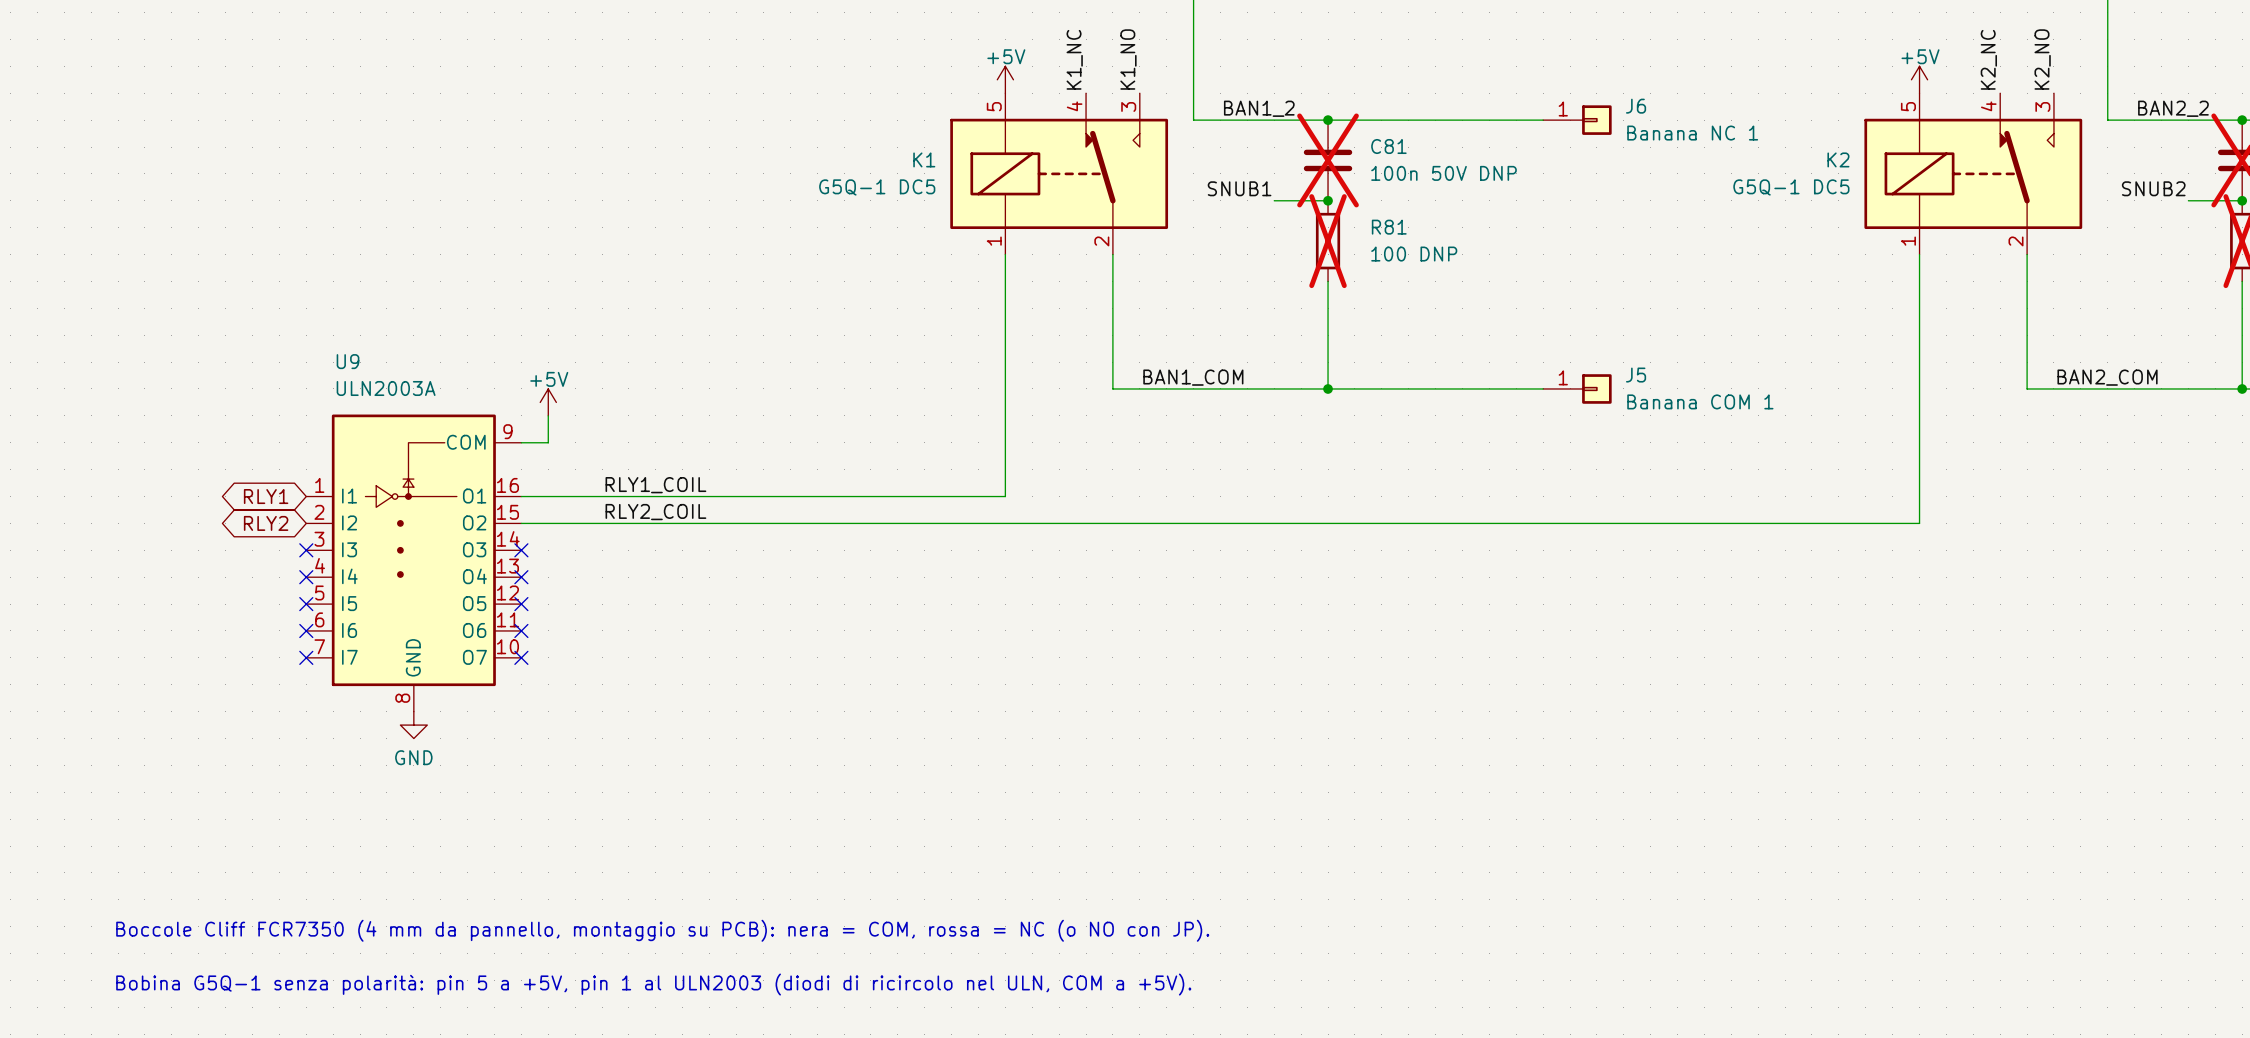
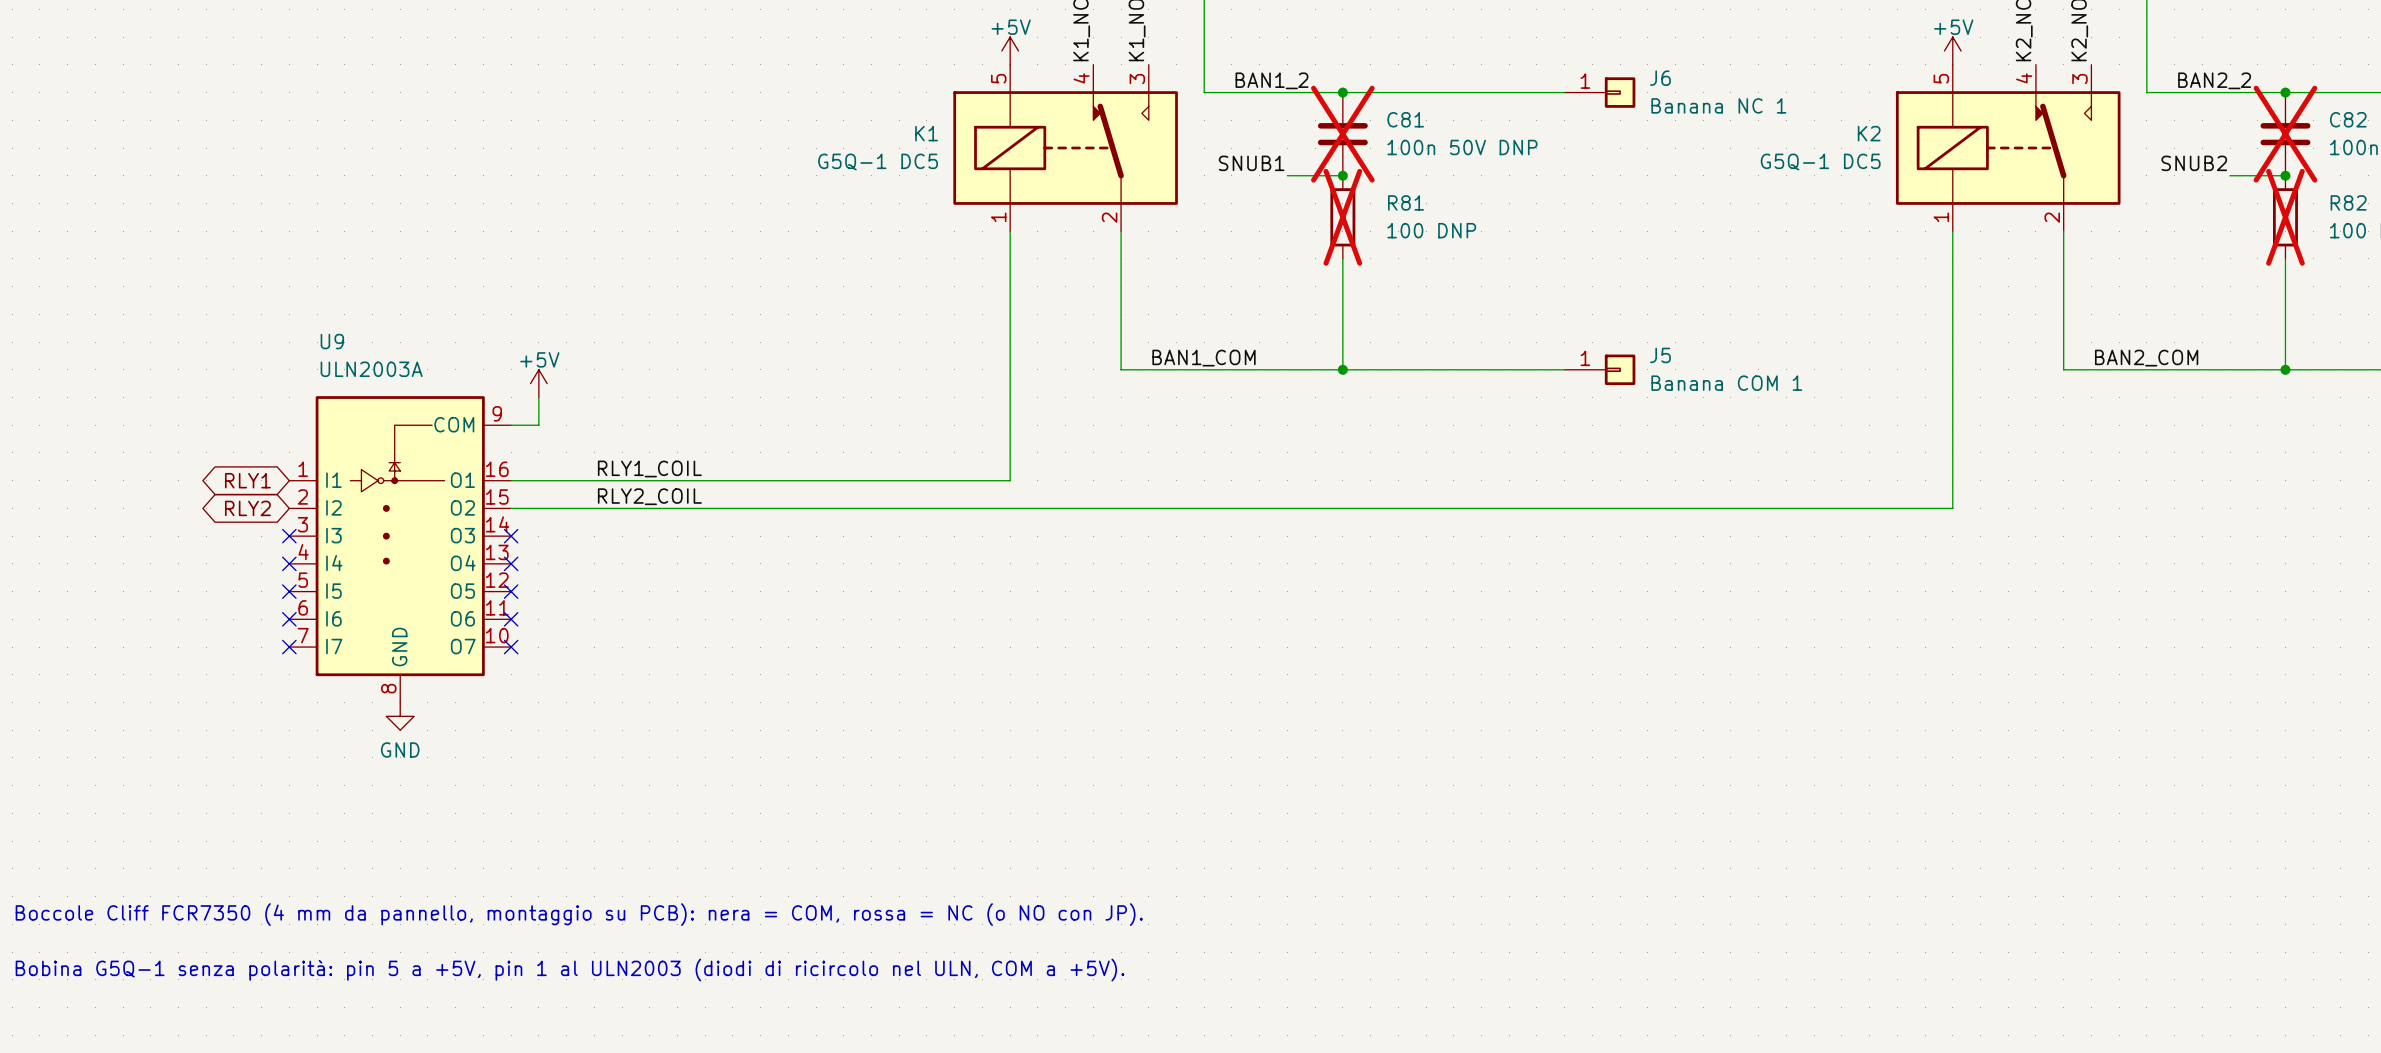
text position: Boccole Cliff FCR7350 (4 mm da pannello, montaggio su PCB): nera = COM, rossa = NC (o NO con JP). (662, 930) -> Boccole Cliff FCR7350 (4 mm da pannello, montaggio su PCB): nera = COM, rossa = NC (o NO con JP). (579, 914)
text position: Bobina G5Q-1 senza polarità: pin 5 a +5V, pin 1 al ULN2003 (diodi di ricircolo nel ULN, COM a +5V). (653, 984) -> Bobina G5Q-1 senza polarità: pin 5 a +5V, pin 1 al ULN2003 (diodi di ricircolo nel ULN, COM a +5V). (569, 970)

